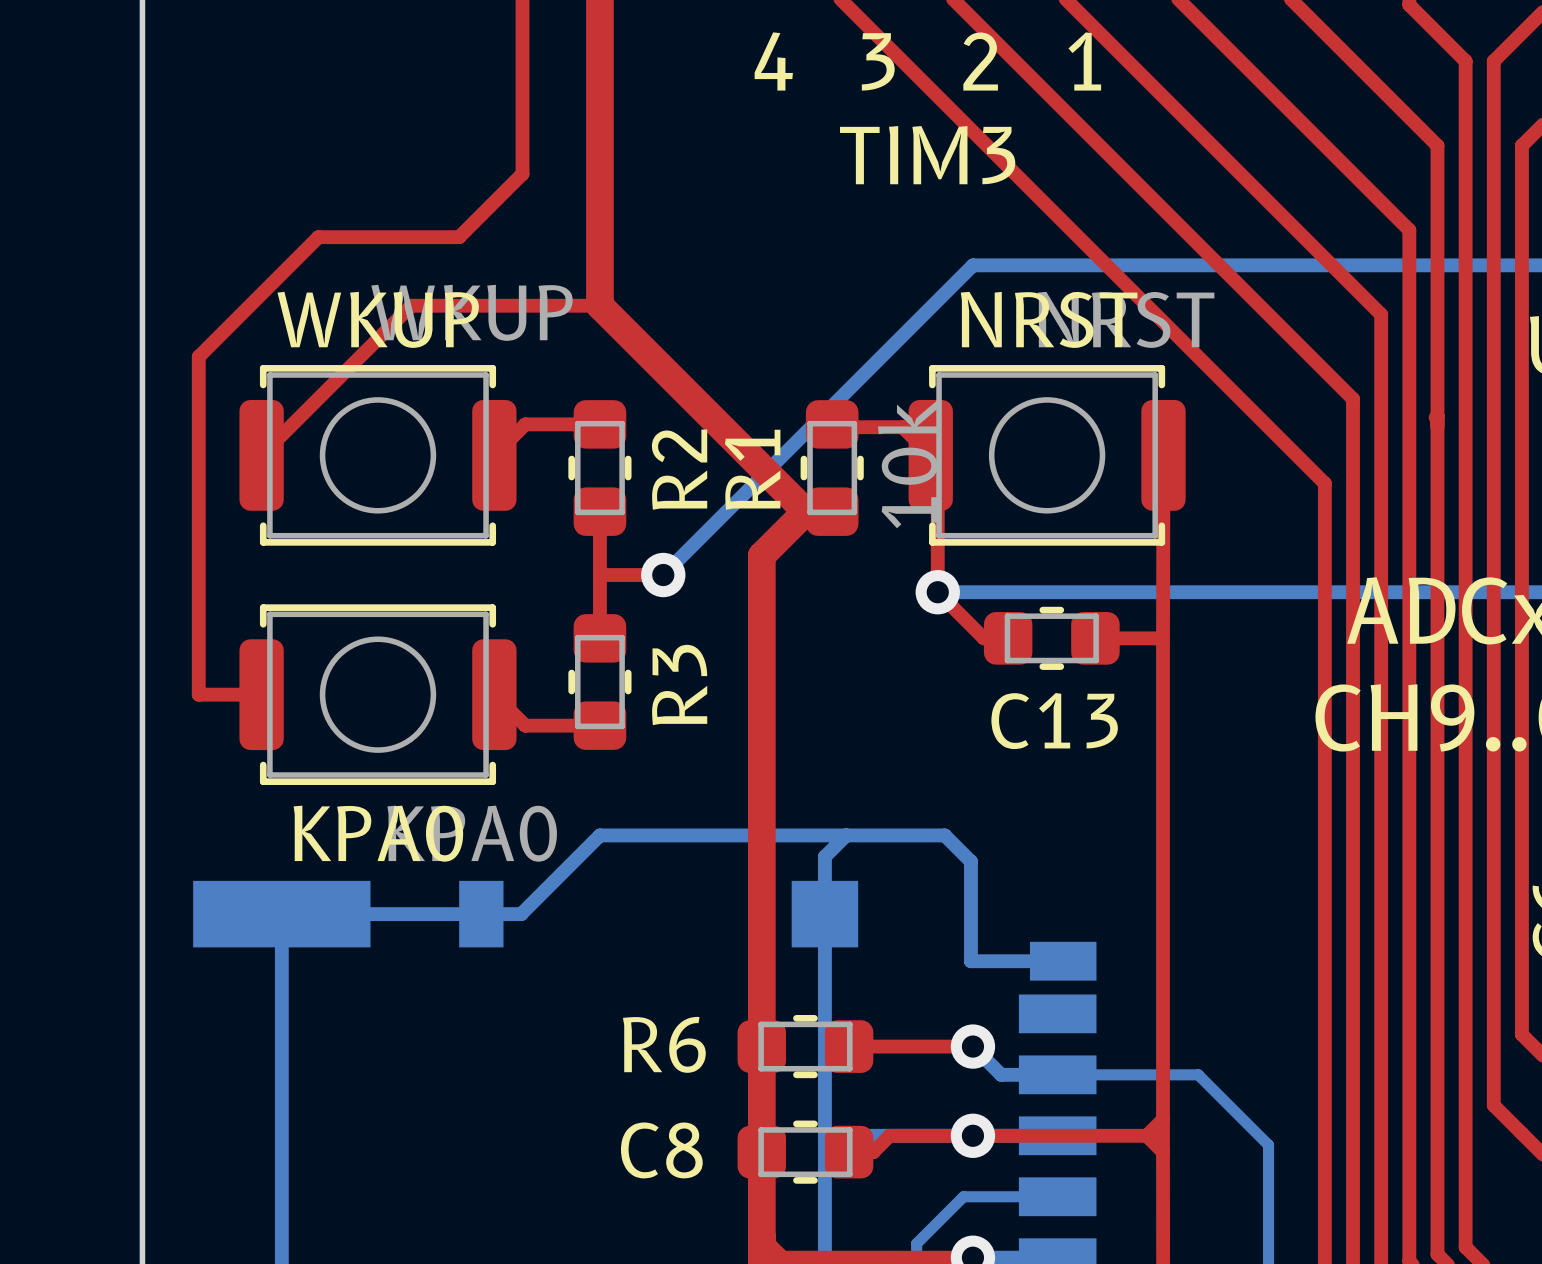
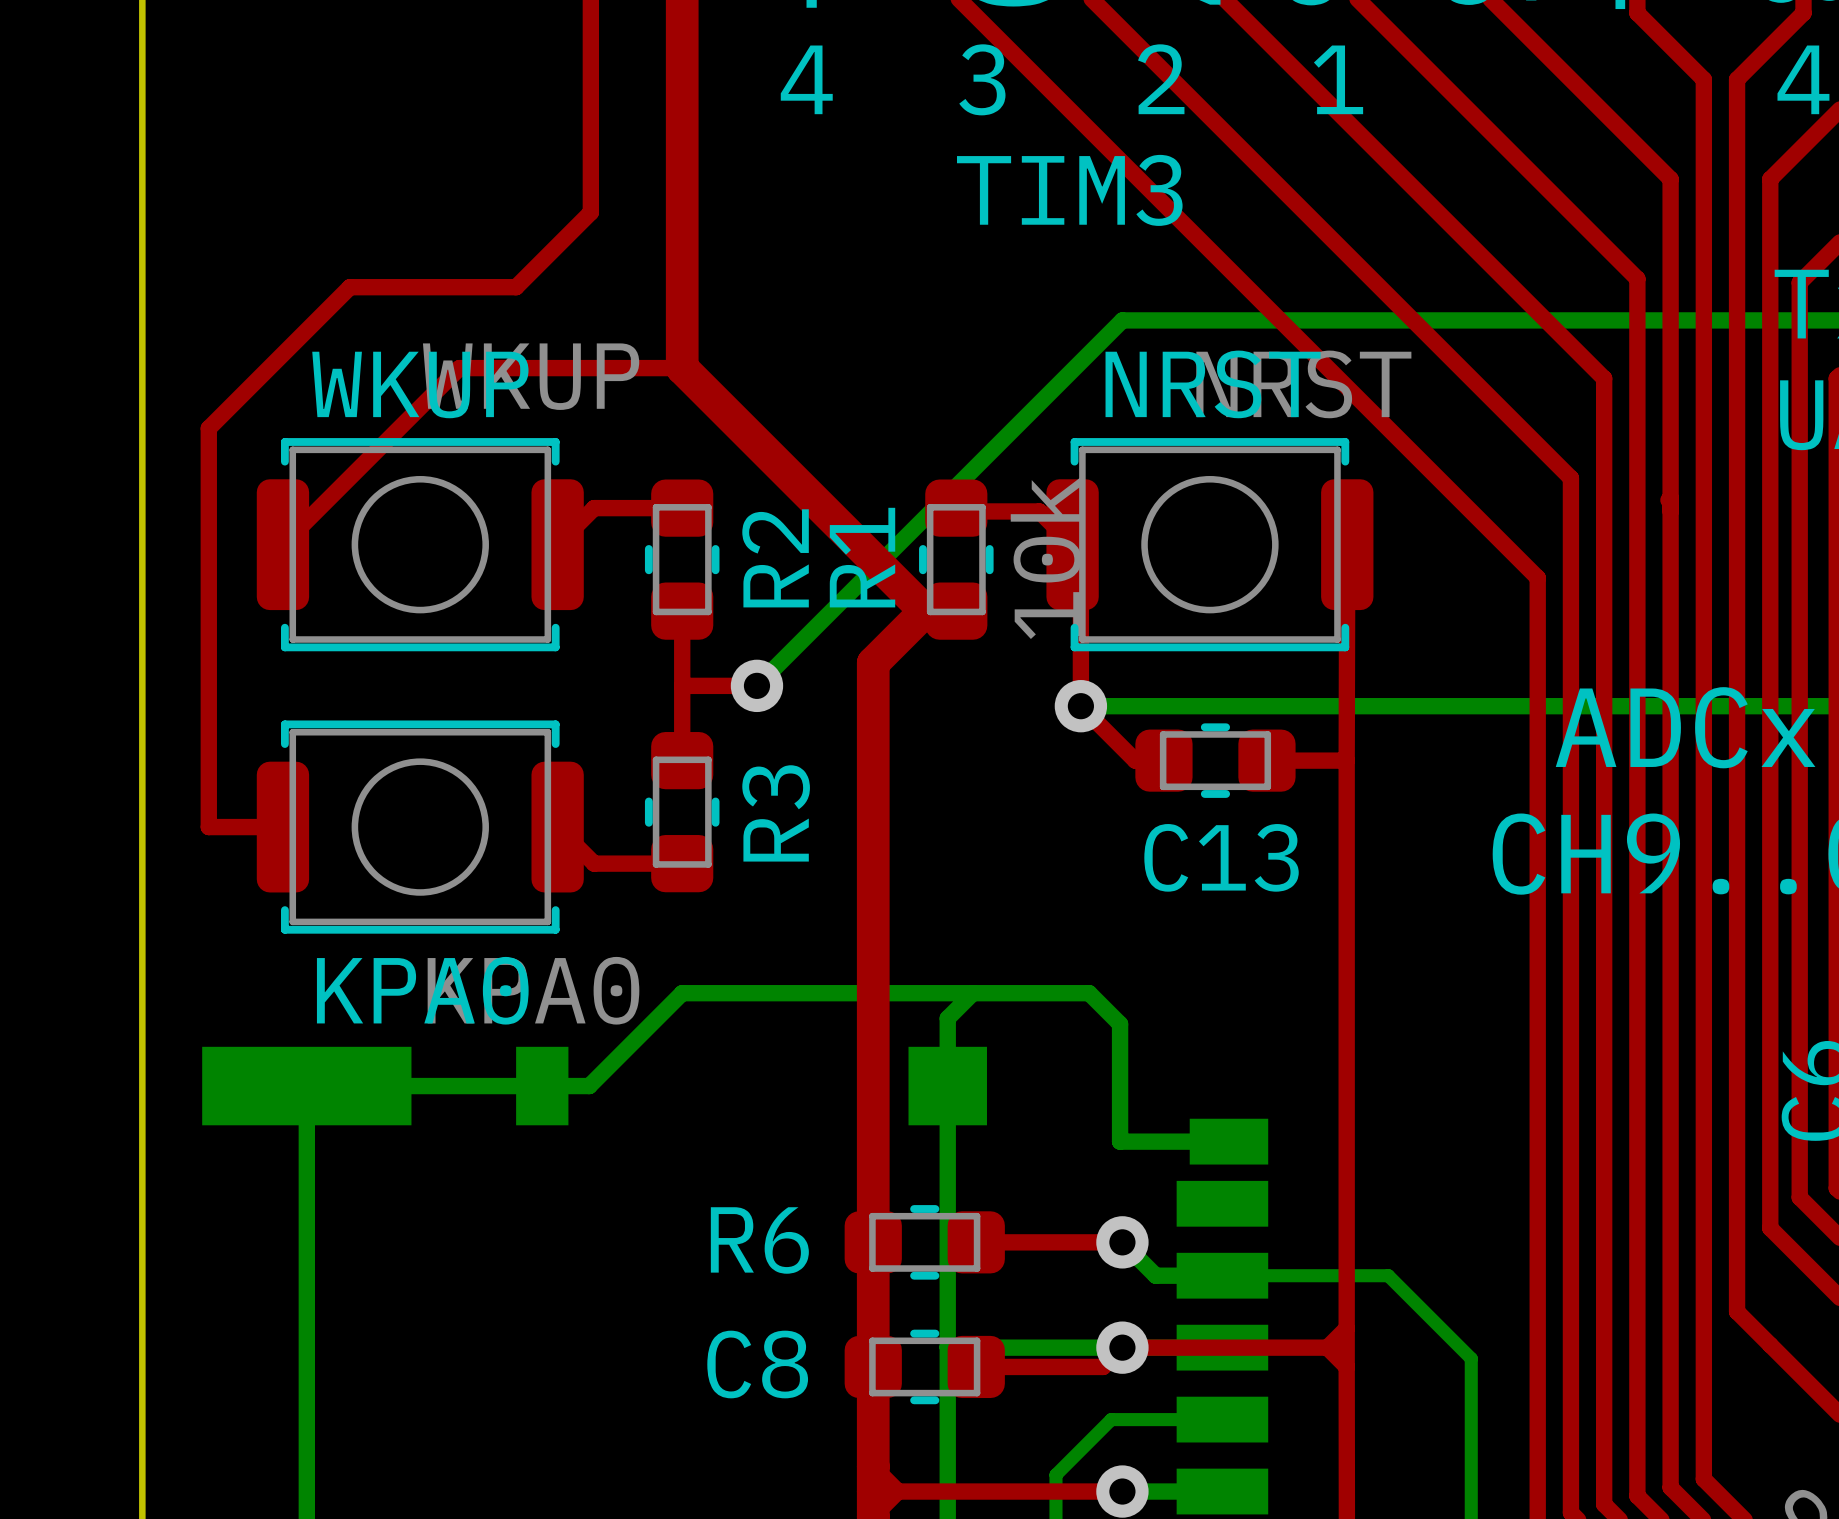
top track: (972, 1135) (889, 1135) (873, 1152) -> (1122, 1347) (1103, 1366) (1004, 1366)

